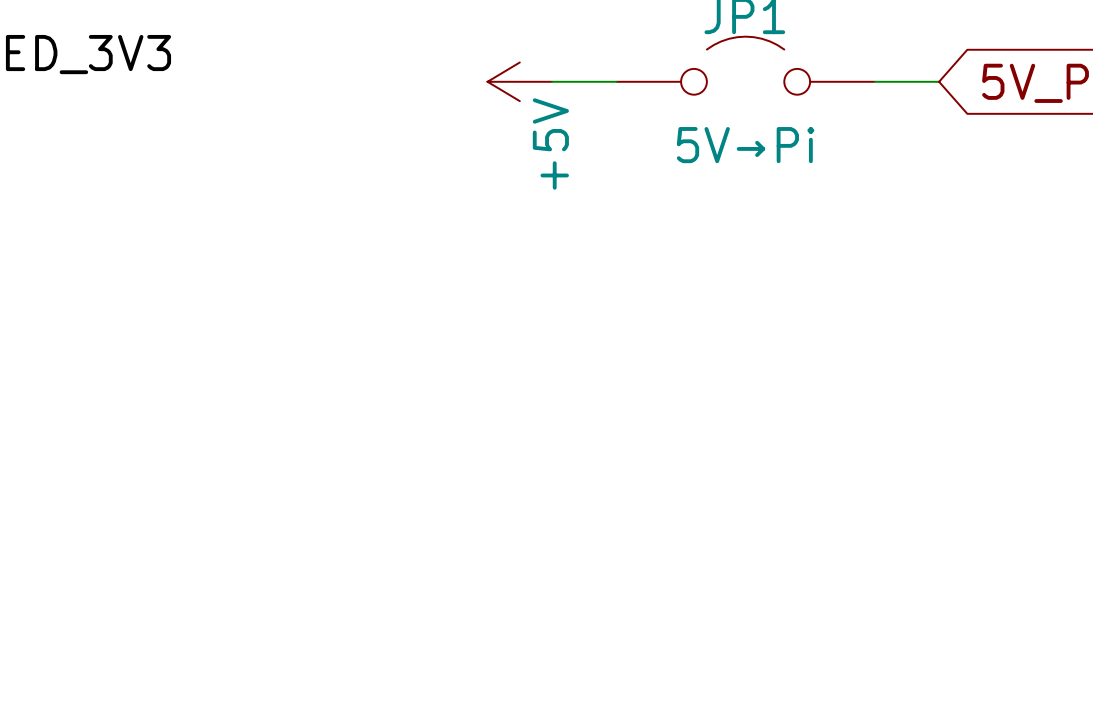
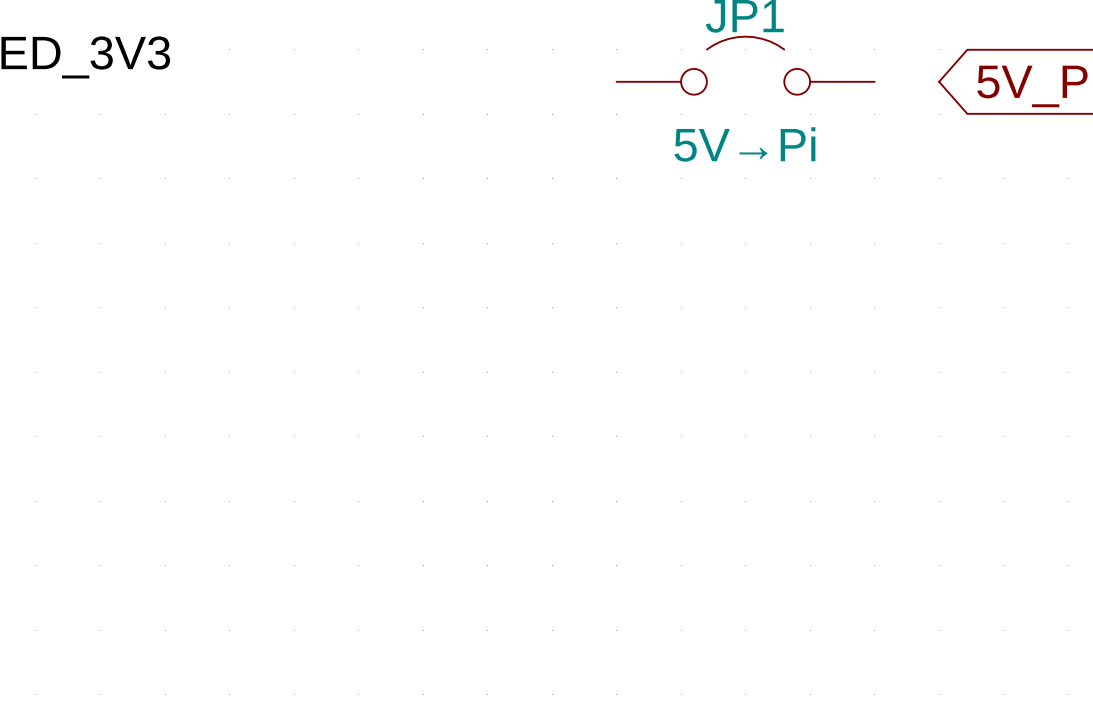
power symbol: +5V (519, 81) -> none
wire: (552, 81) (616, 81) -> none
wire: (874, 81) (939, 81) -> none

